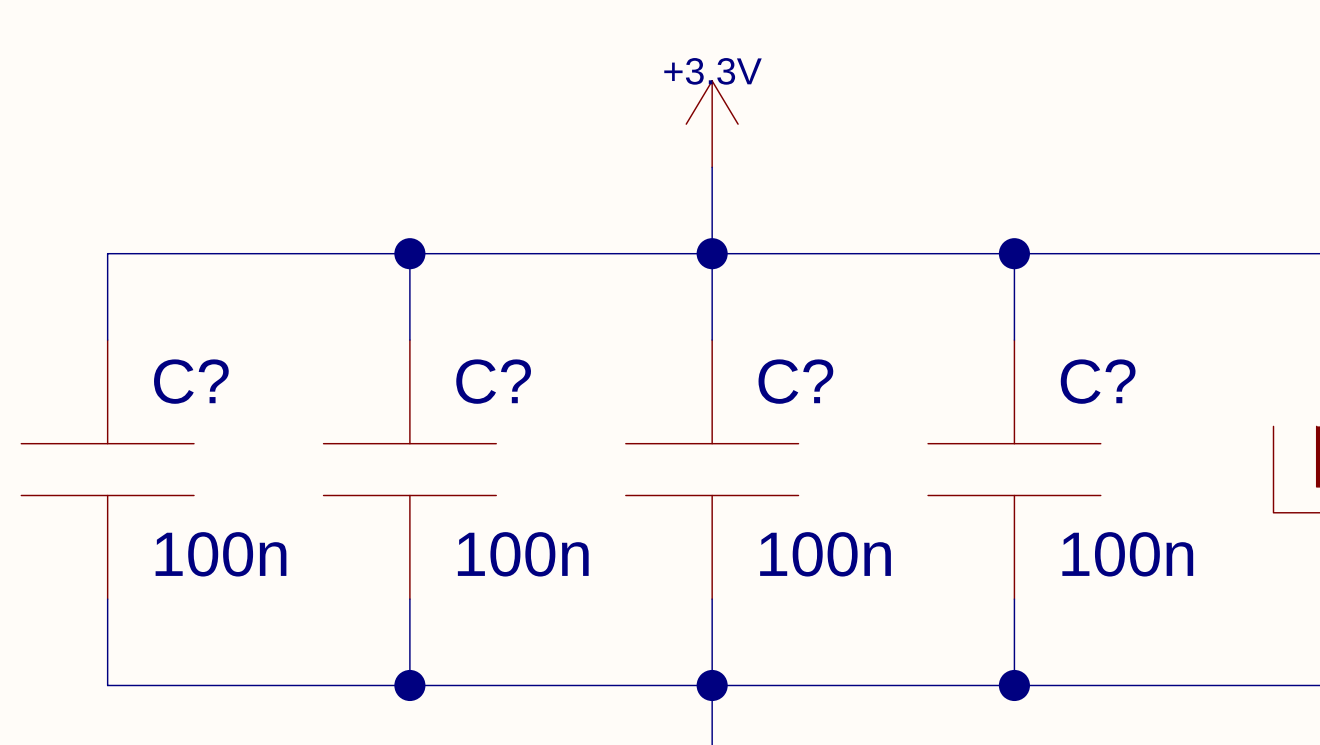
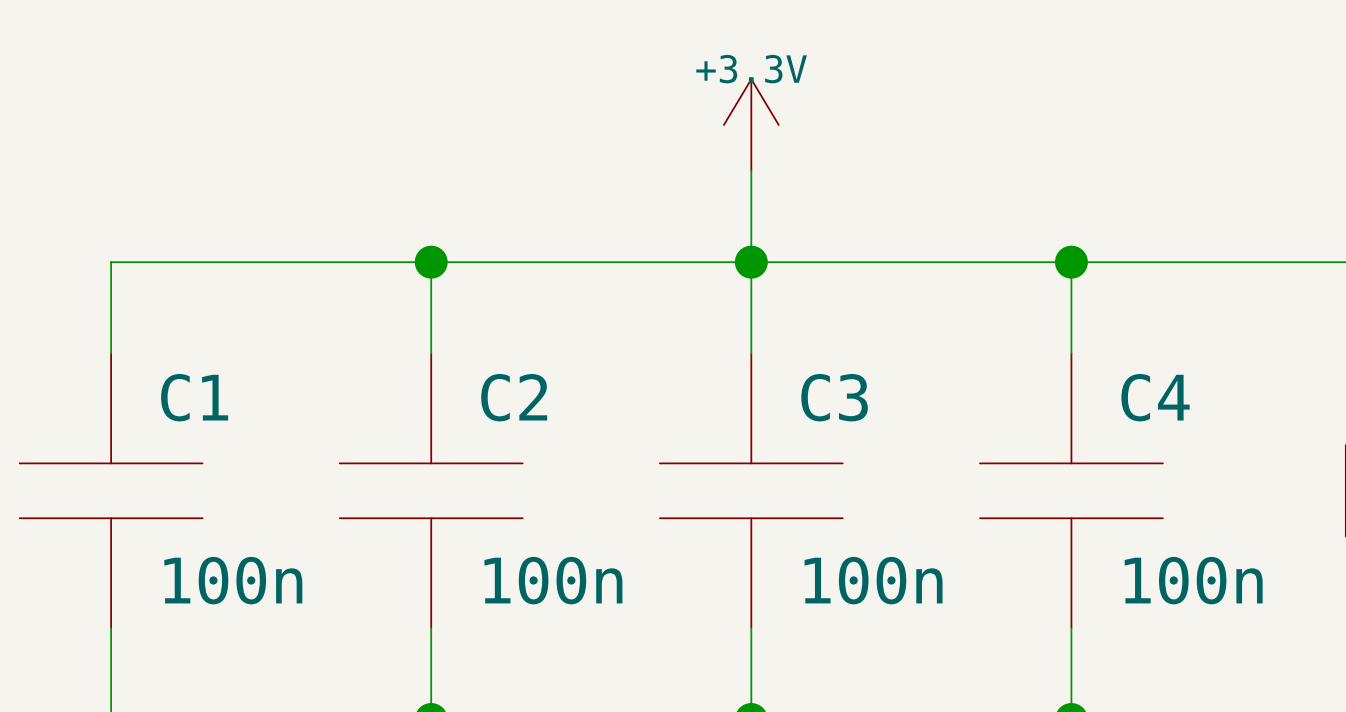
C? name: C? (191, 381) -> C1 (194, 397)
C? name: C? (493, 381) -> C2 (514, 397)
C? name: C? (795, 381) -> C3 (834, 397)
C? name: C? (1098, 381) -> C4 (1155, 397)

